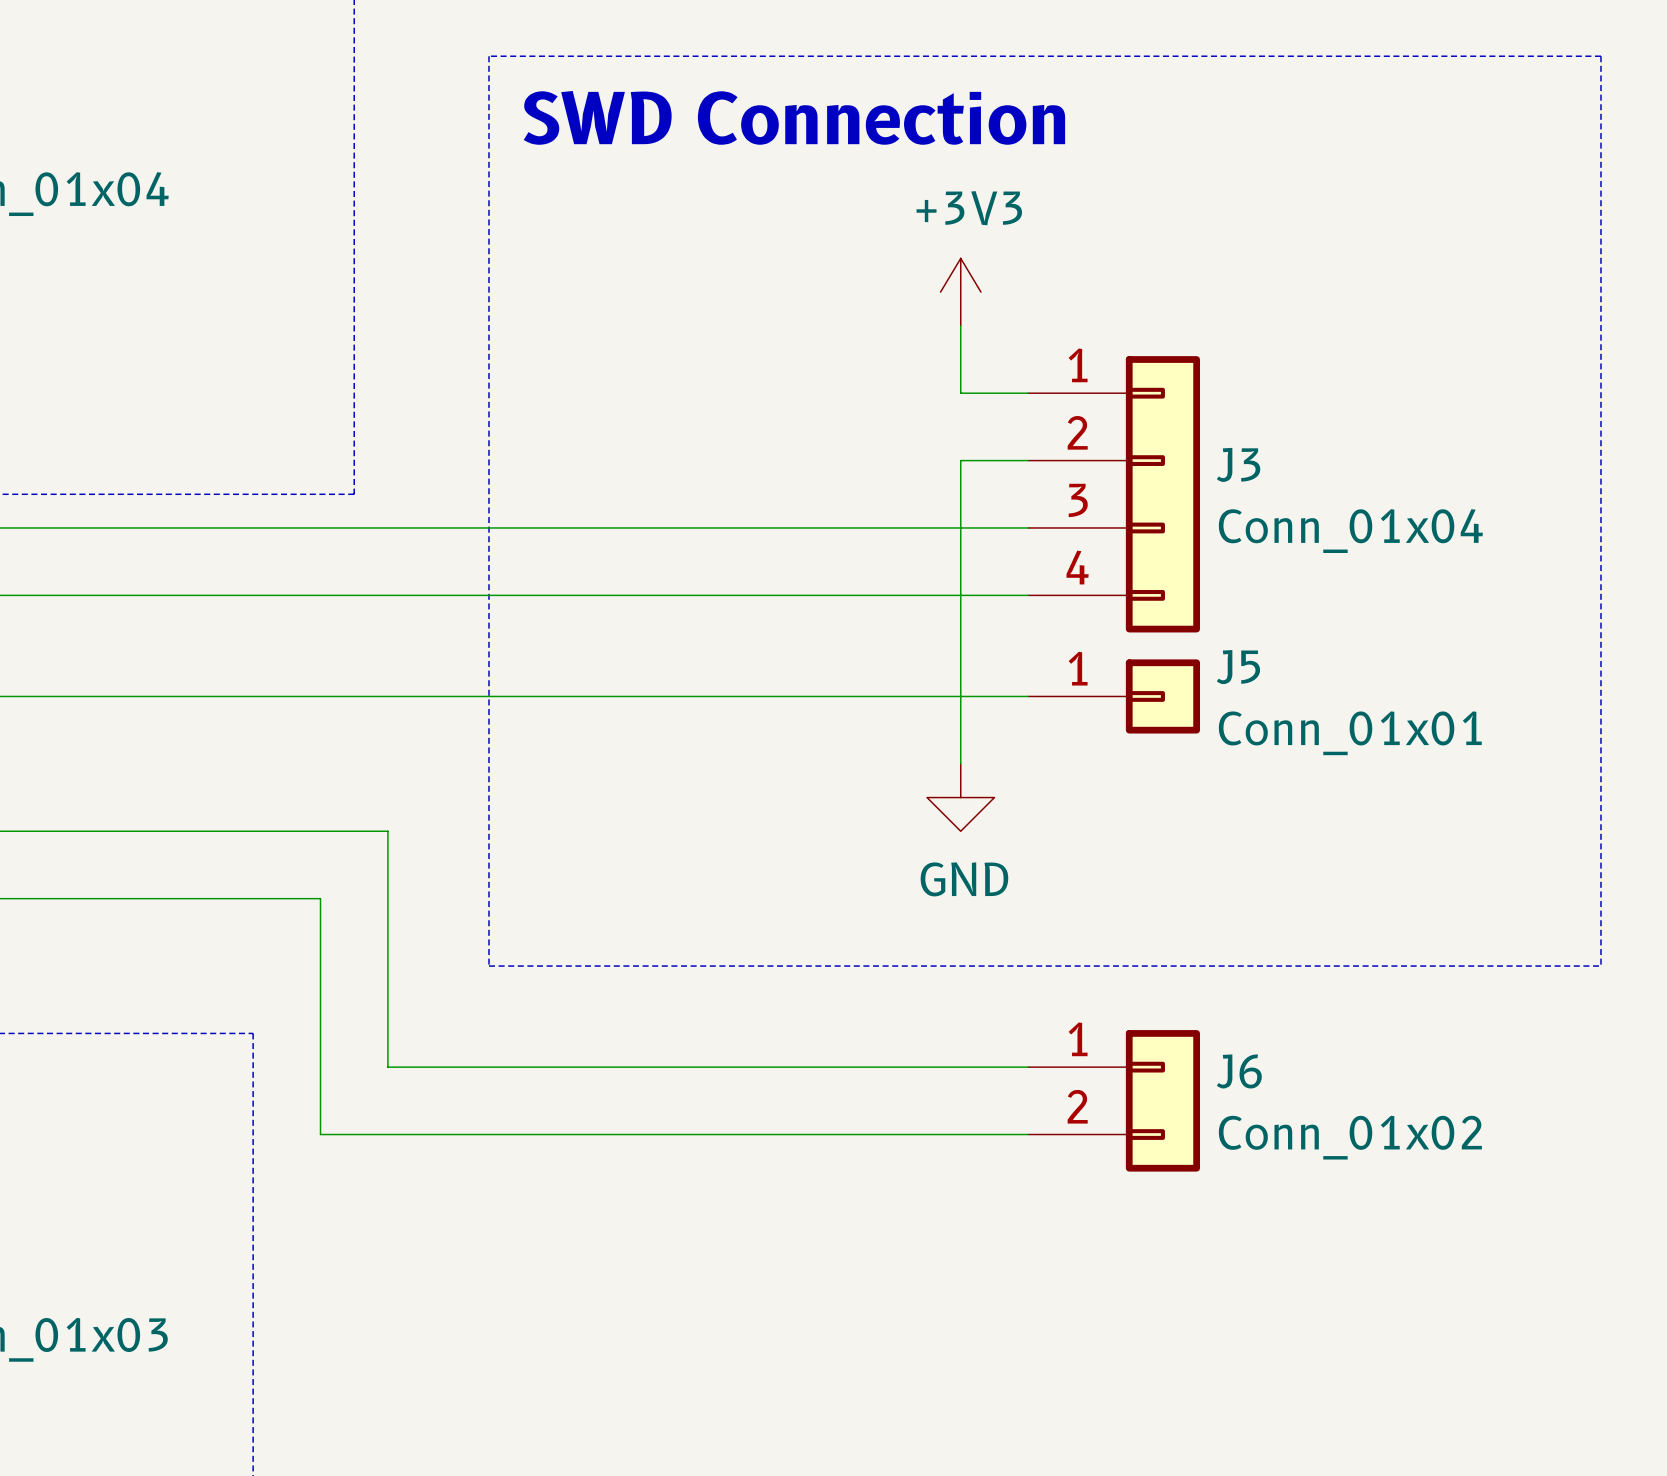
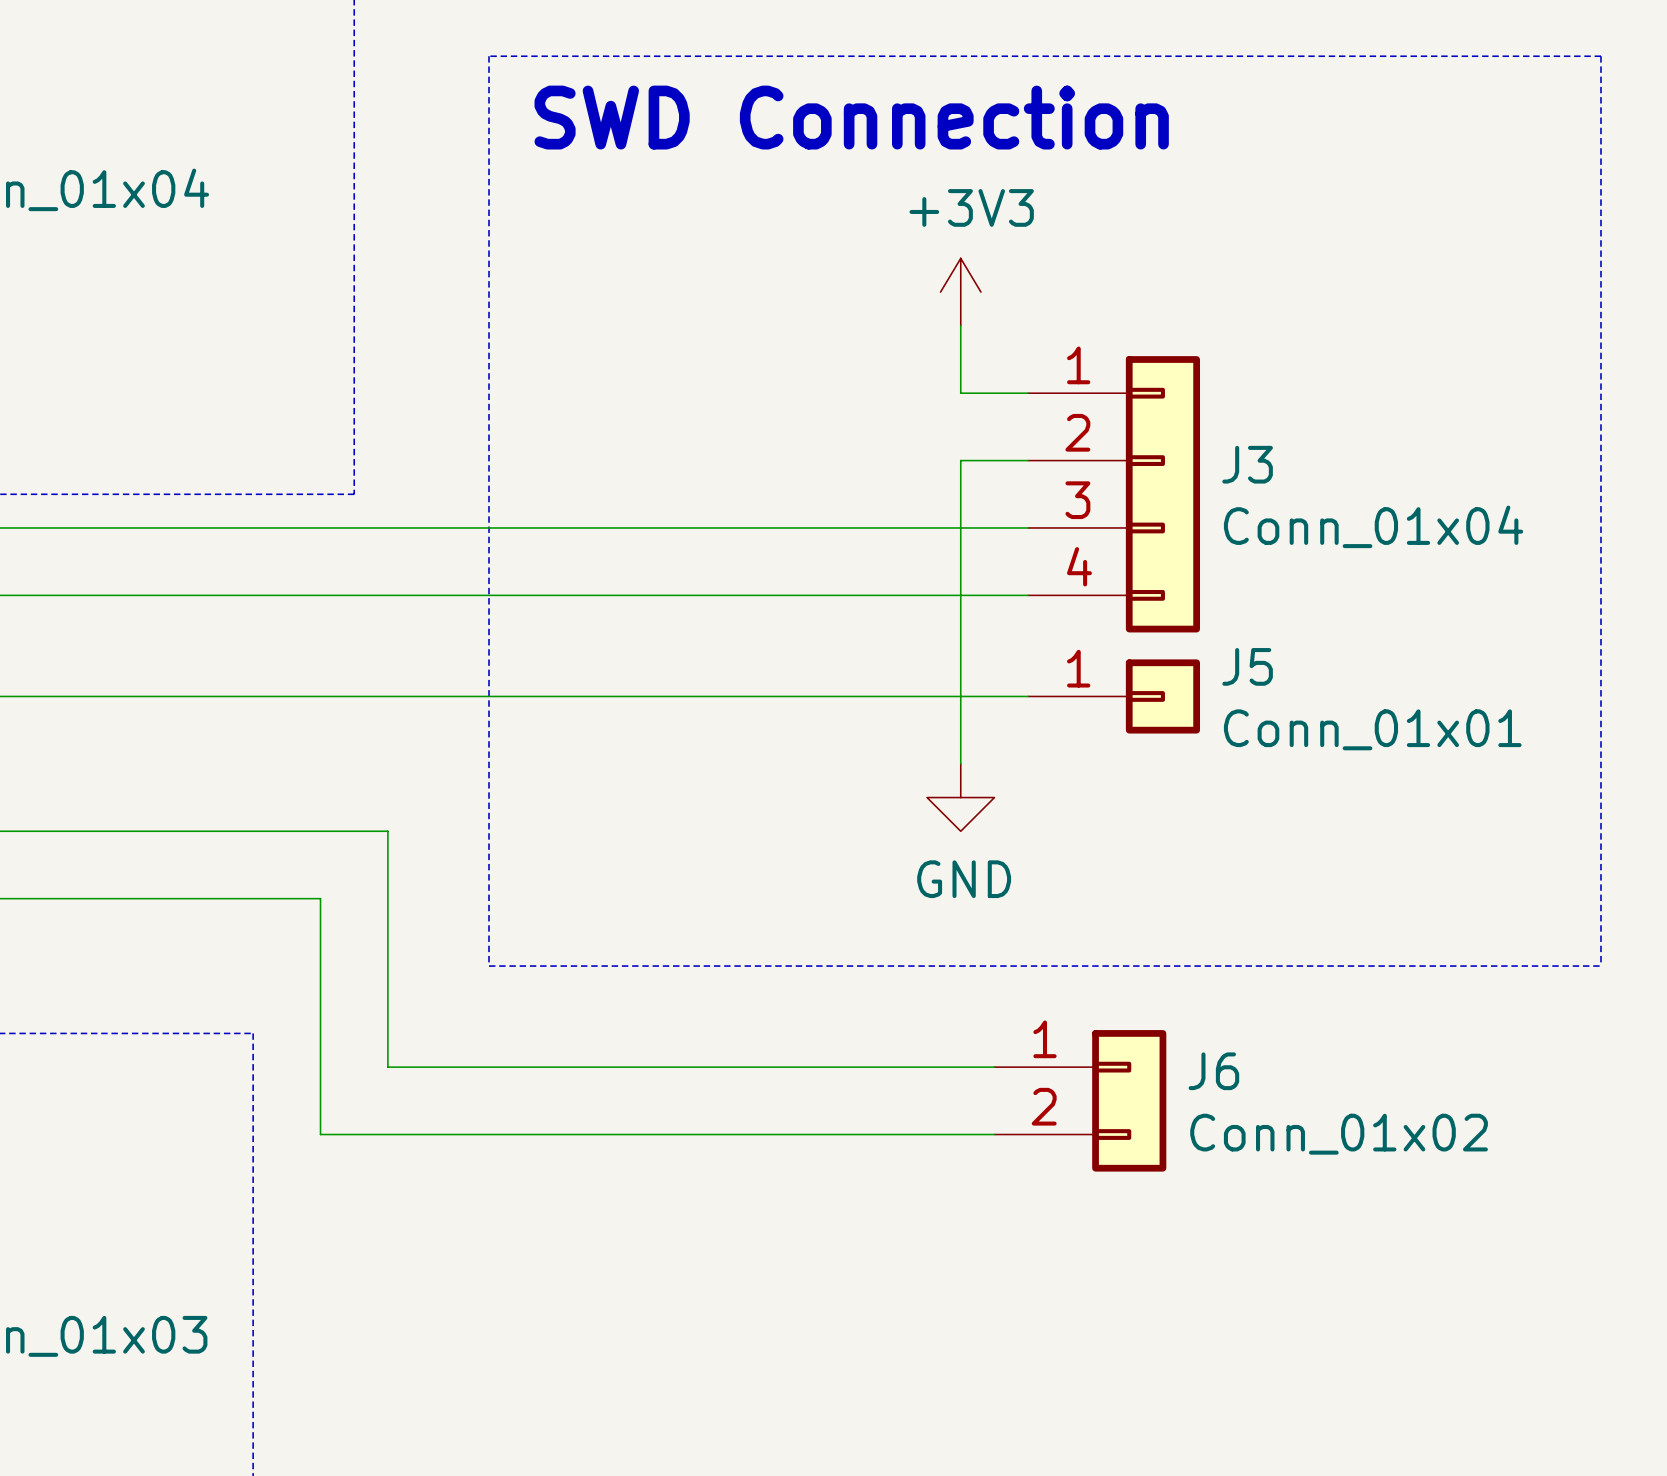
J6 position: (1114, 1100) -> (1080, 1100)

